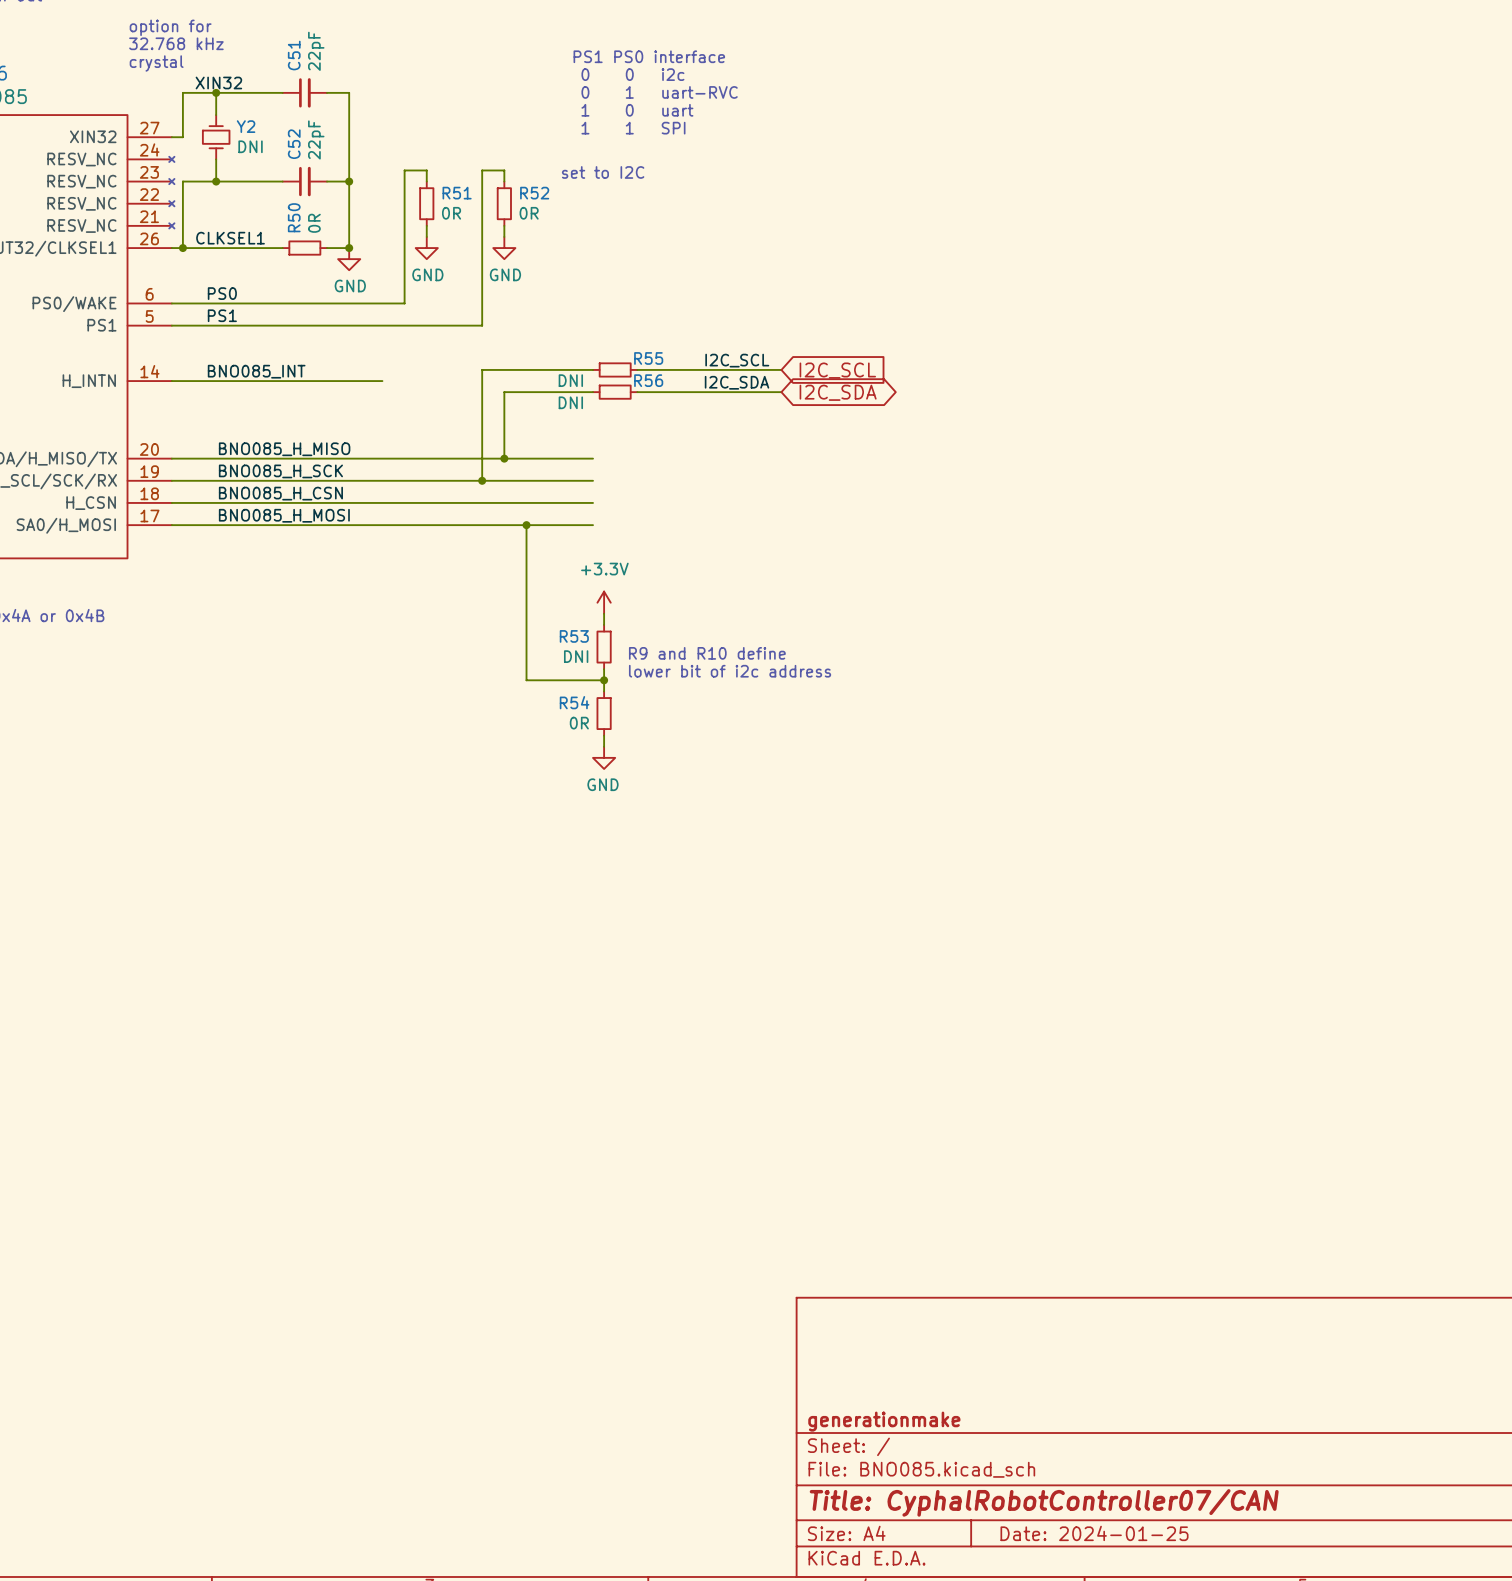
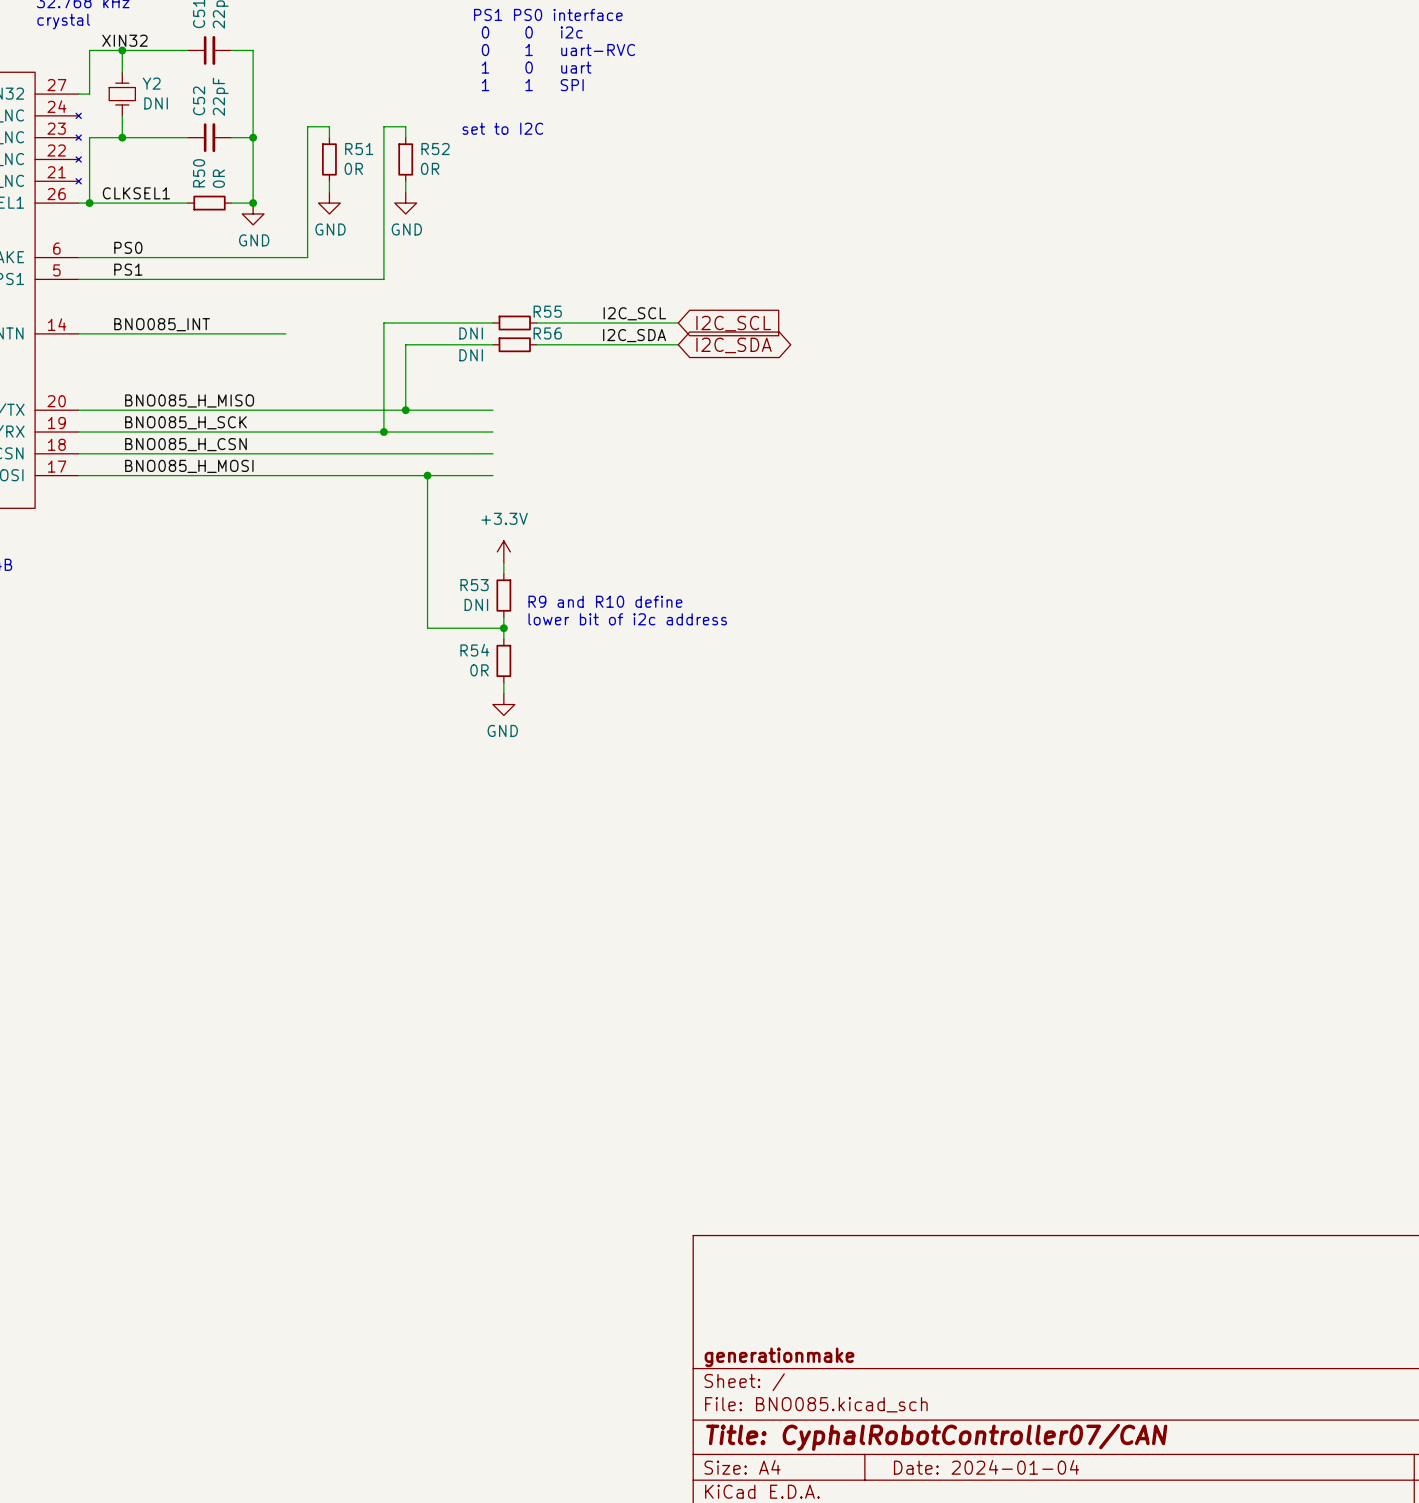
title block: Date: 2024-01-25 (1094, 1533) -> Date: 2024-01-04 (986, 1467)

